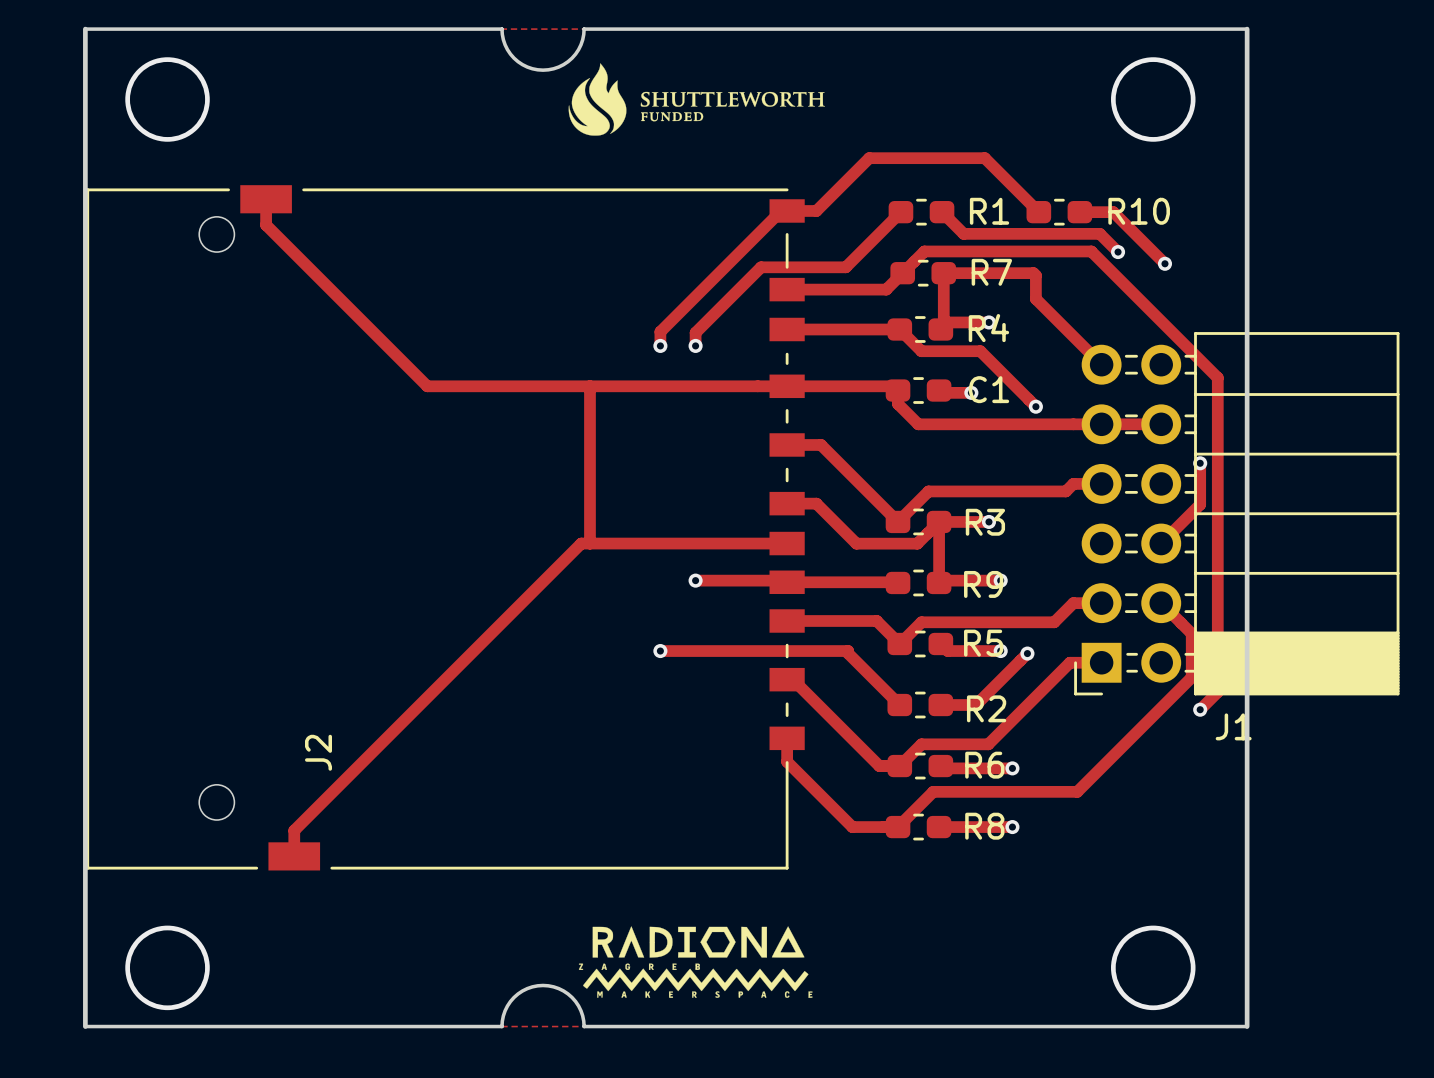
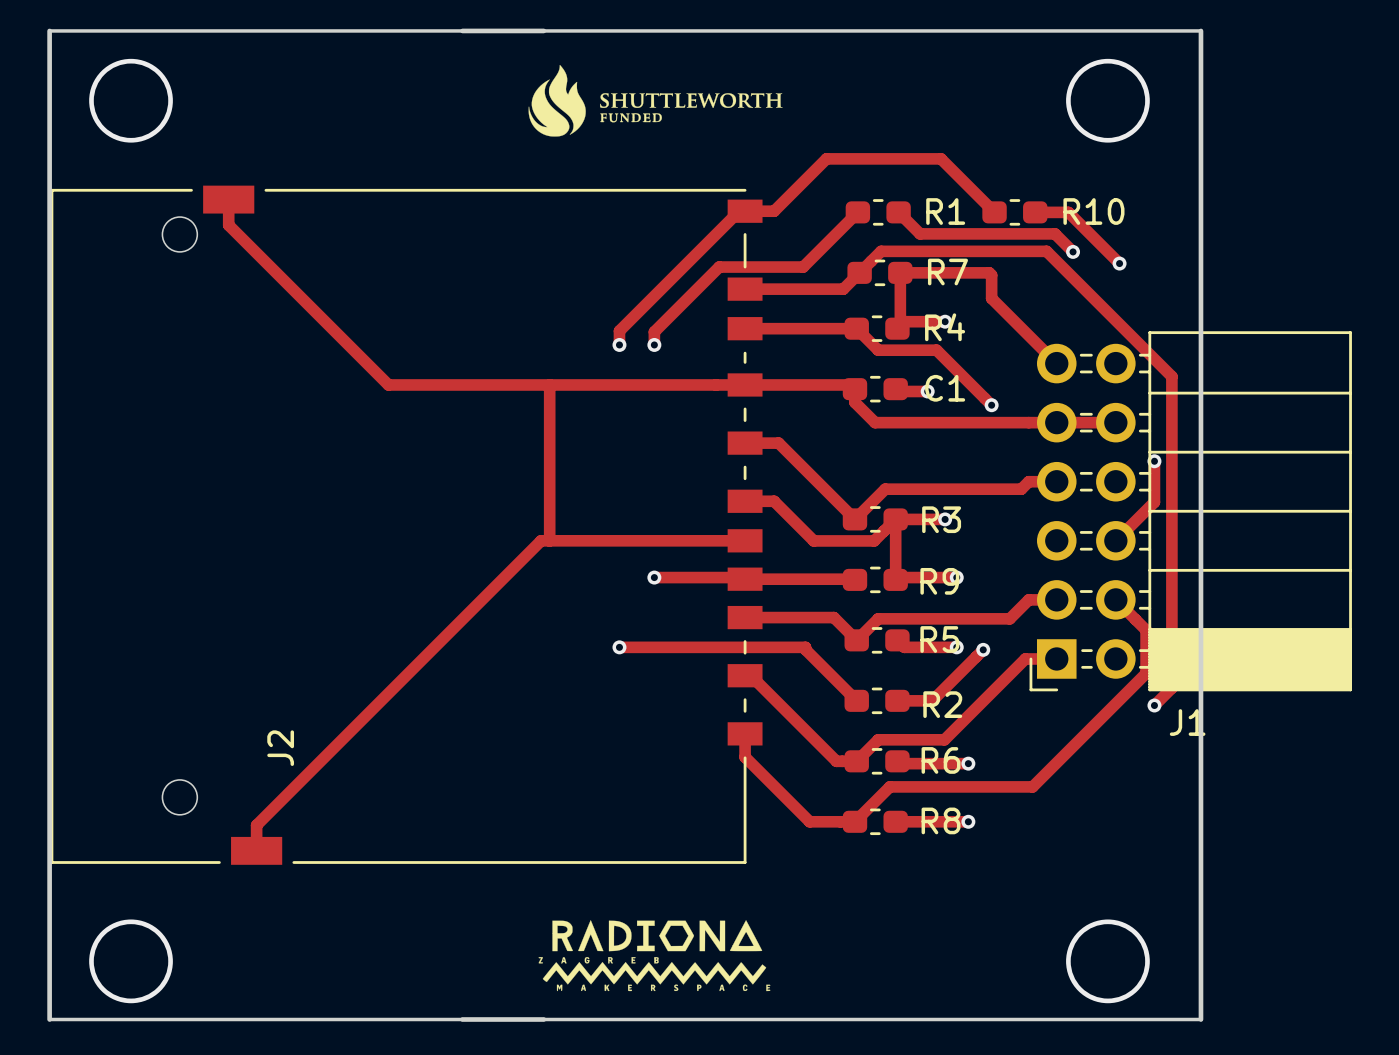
board edge: (501, 29) (505, 44) (514, 58) (527, 67) (543, 70) (558, 67) (572, 58) (580, 44) (584, 29) -> (462, 30) (543, 30)
board edge: (501, 1026) (505, 1010) (514, 997) (527, 988) (543, 985) (558, 988) (572, 997) (580, 1010) (584, 1026) -> (462, 1019) (543, 1019)

